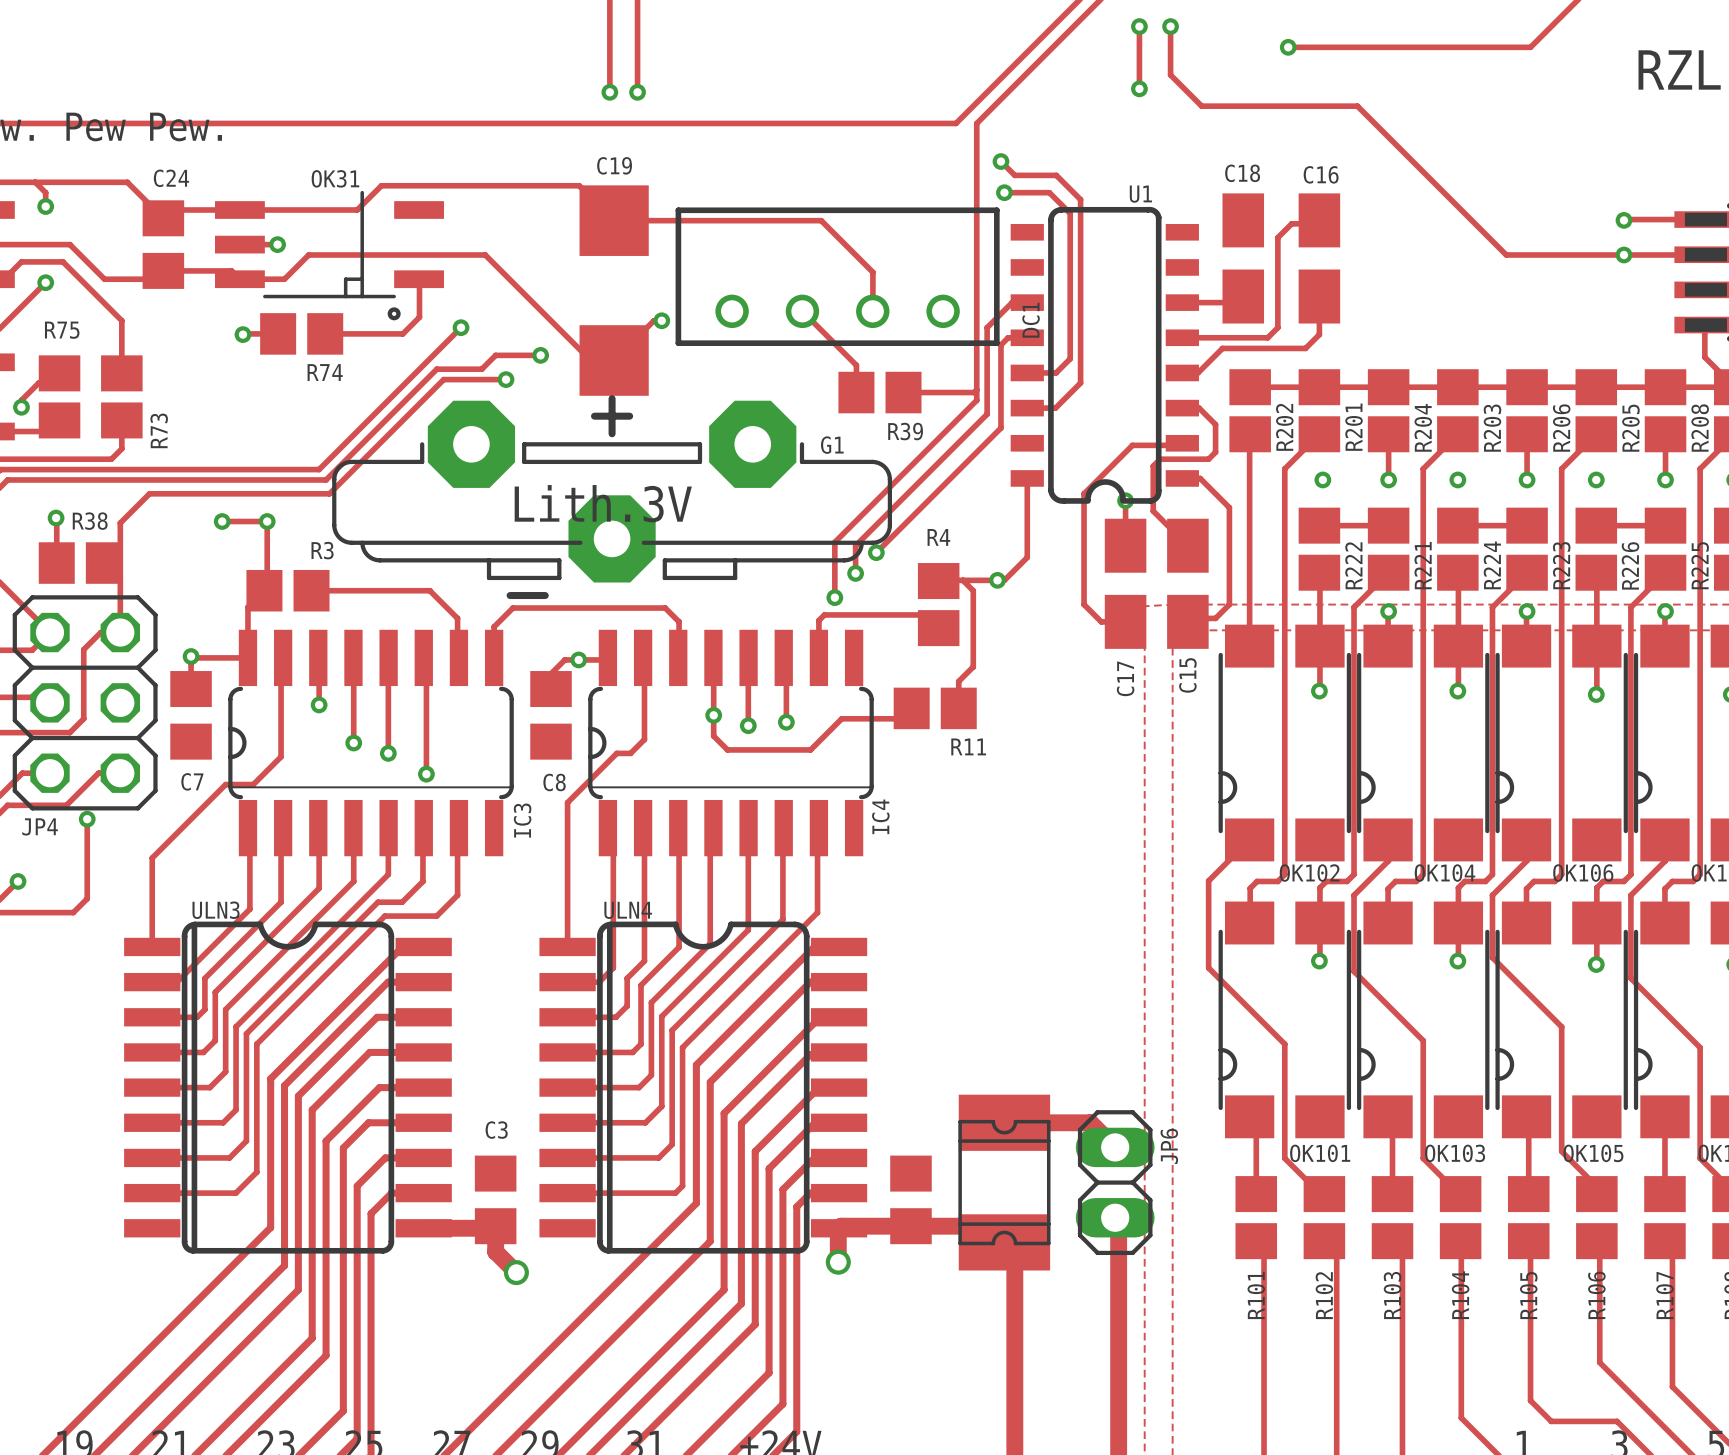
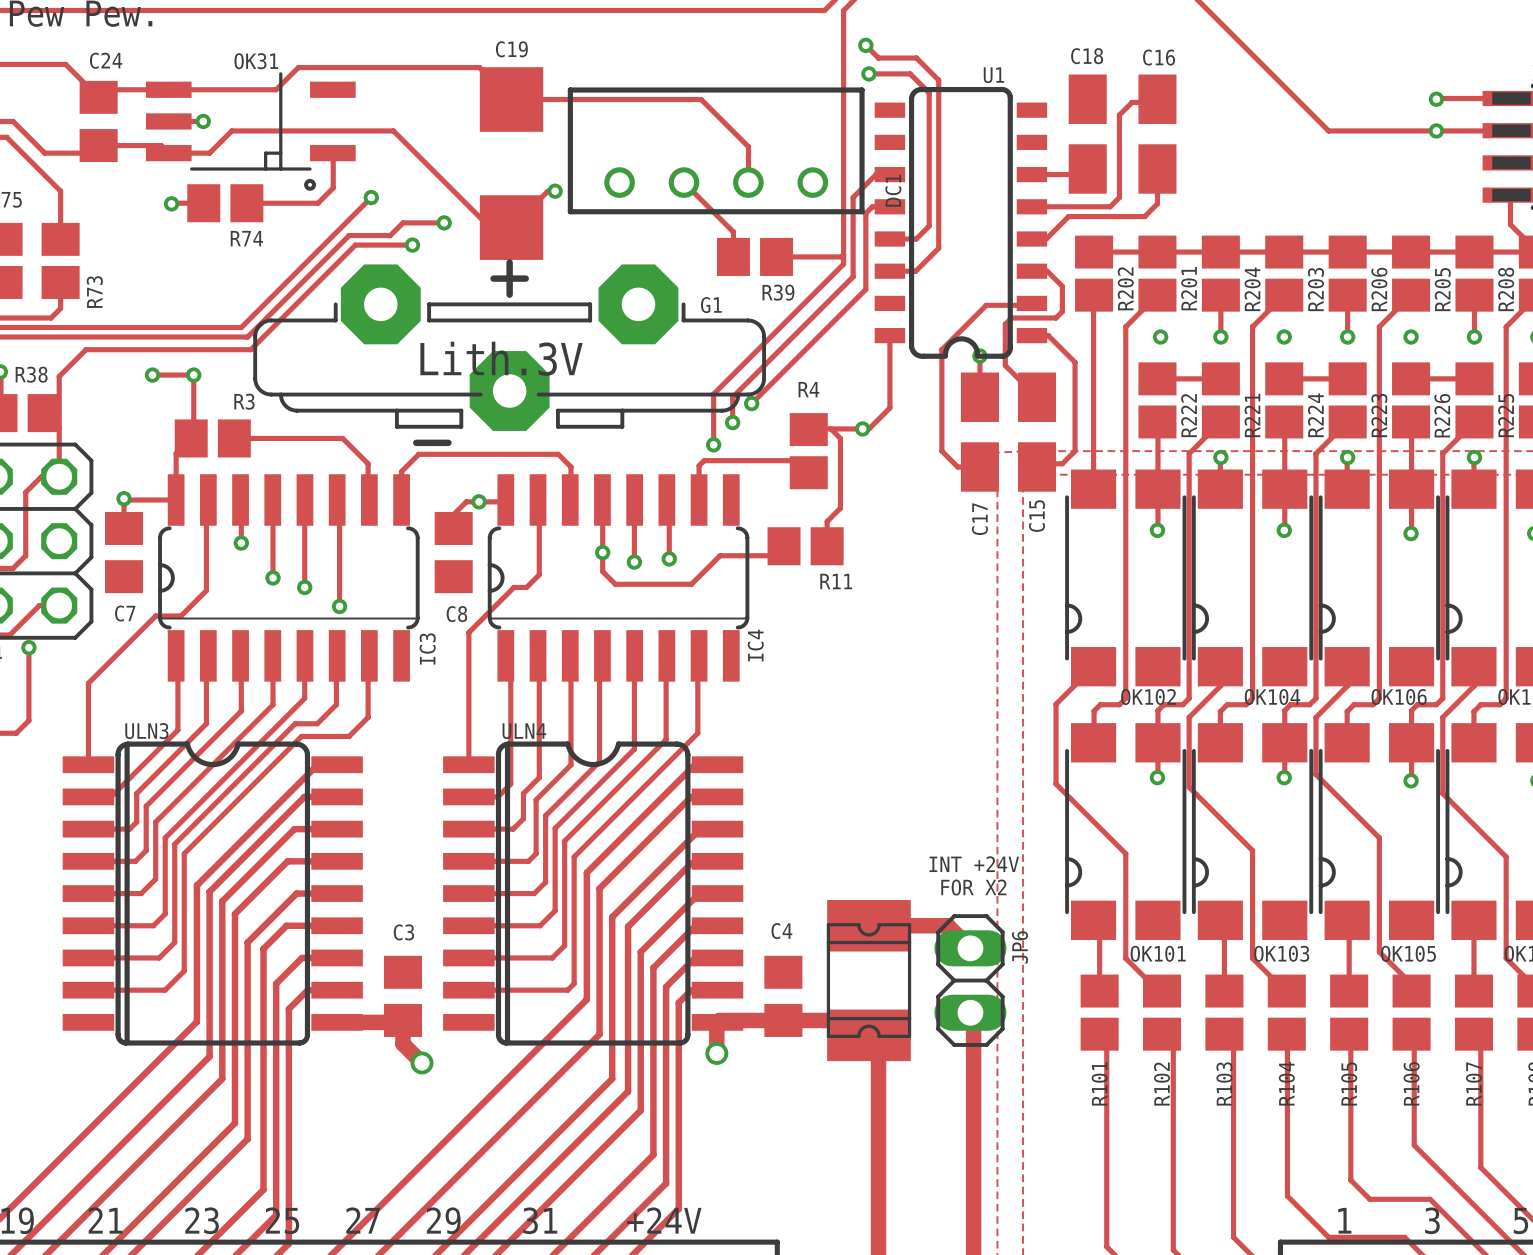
text: none -> INT +24V (974, 864)
text: none -> FOR X2 (973, 887)
C4 name: none -> C4 (781, 931)

